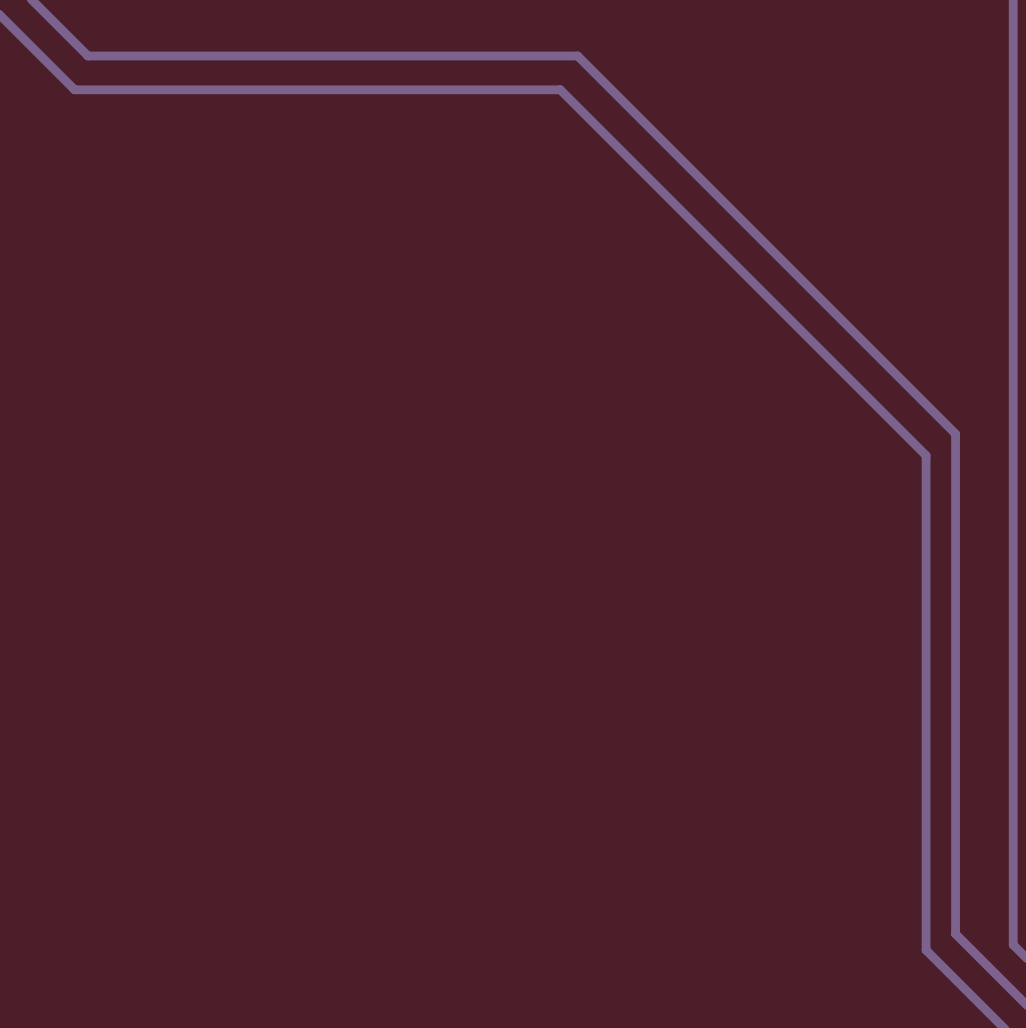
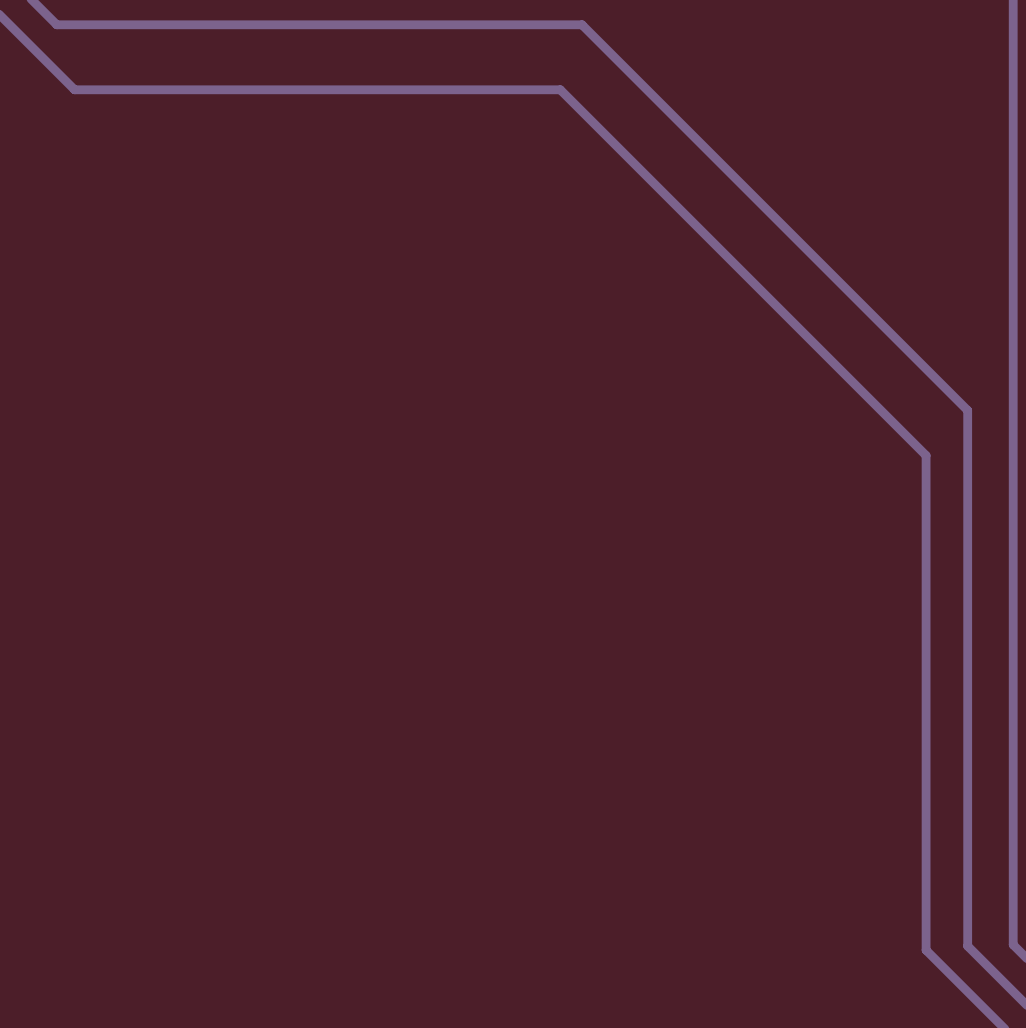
bottom track: (56, 24) (87, 55) (577, 55) (955, 433) (955, 933) (967, 946) -> (56, 24) (582, 24) (967, 410) (967, 946)

